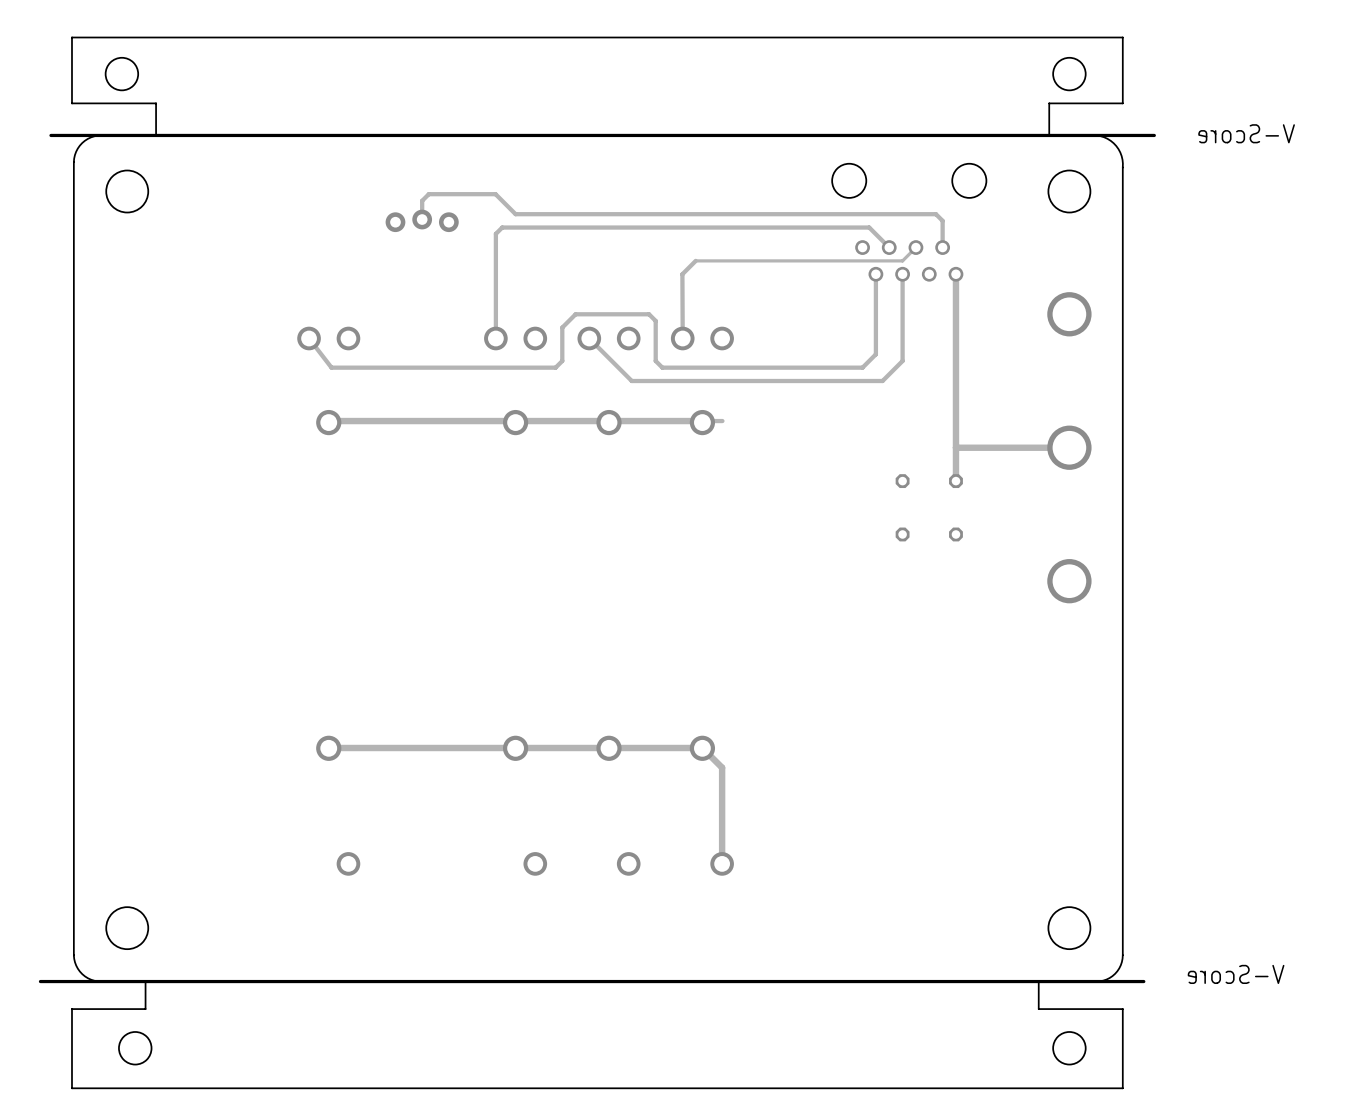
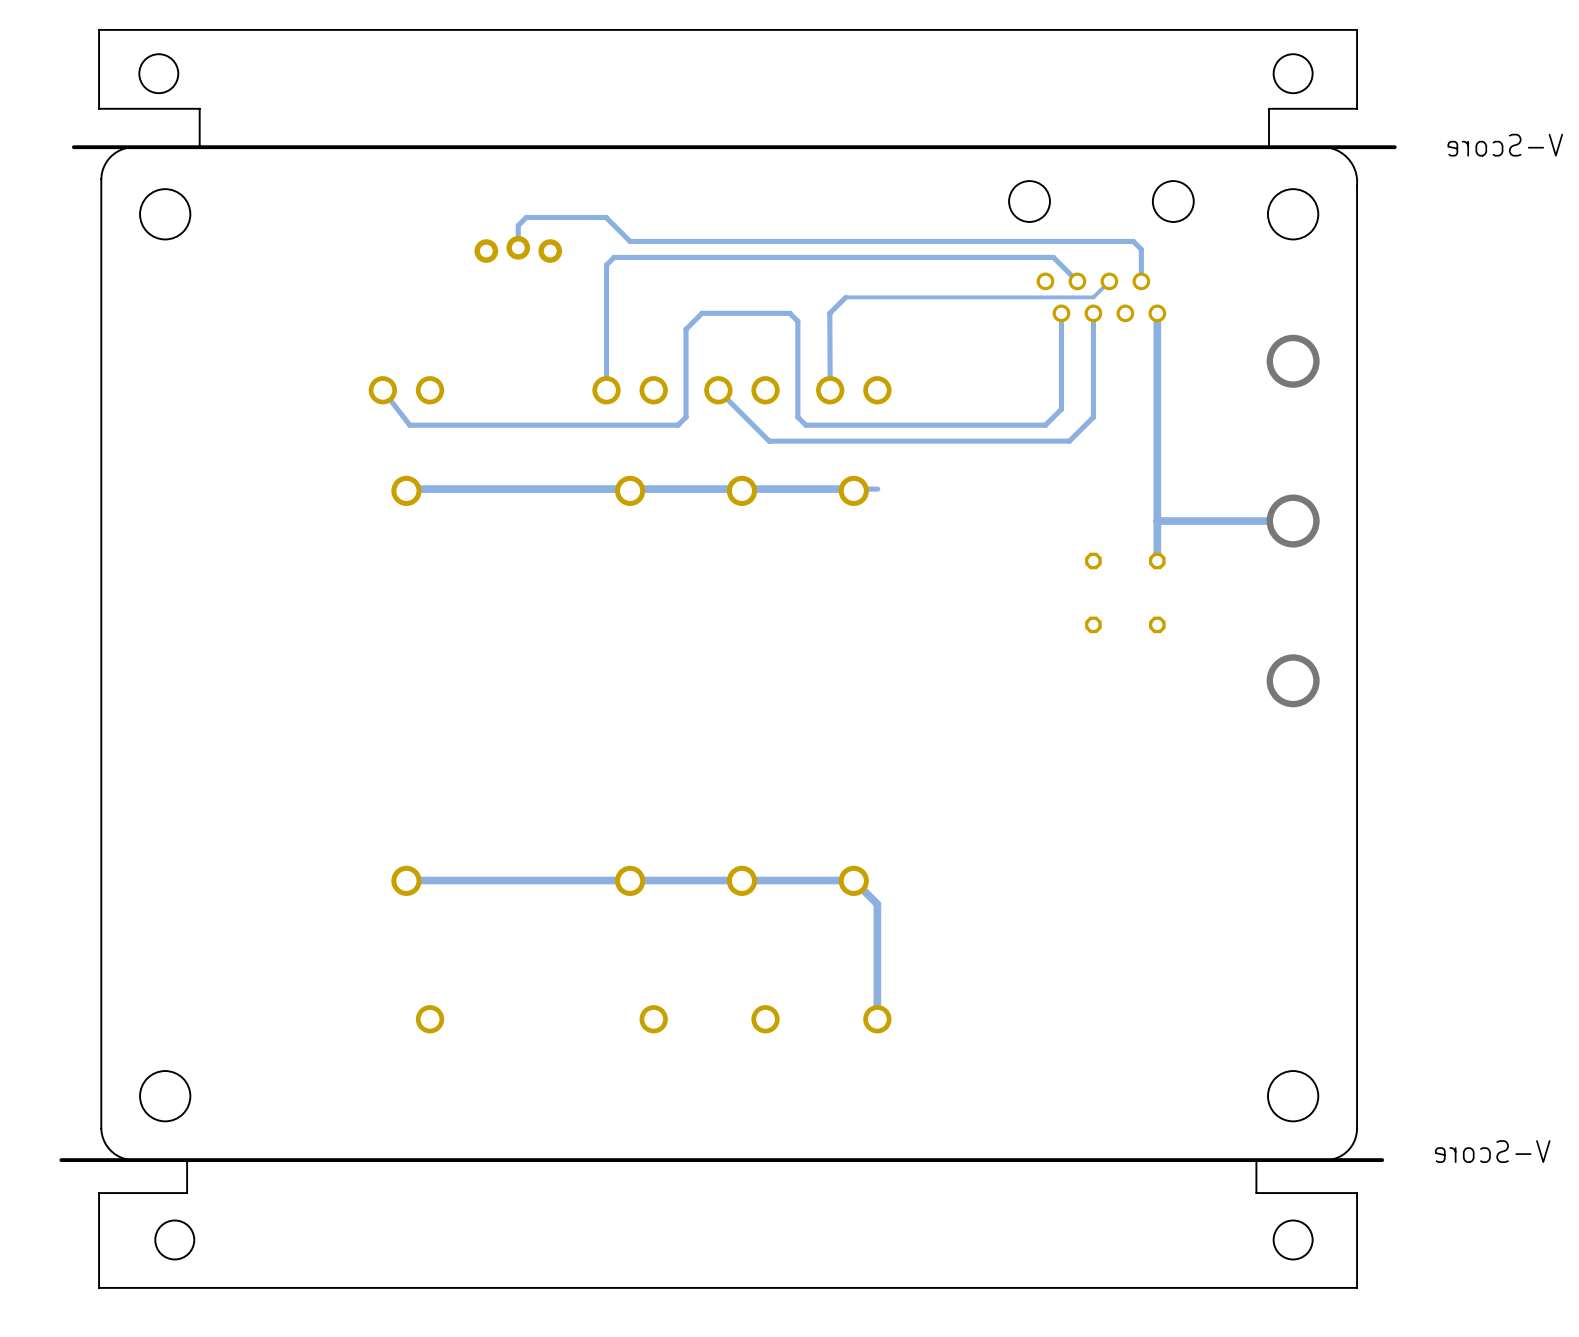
track: (655, 320) (649, 314) (575, 314) (562, 327) -> (797, 369) (797, 321) (789, 313) (702, 313) (686, 329) (686, 377)

